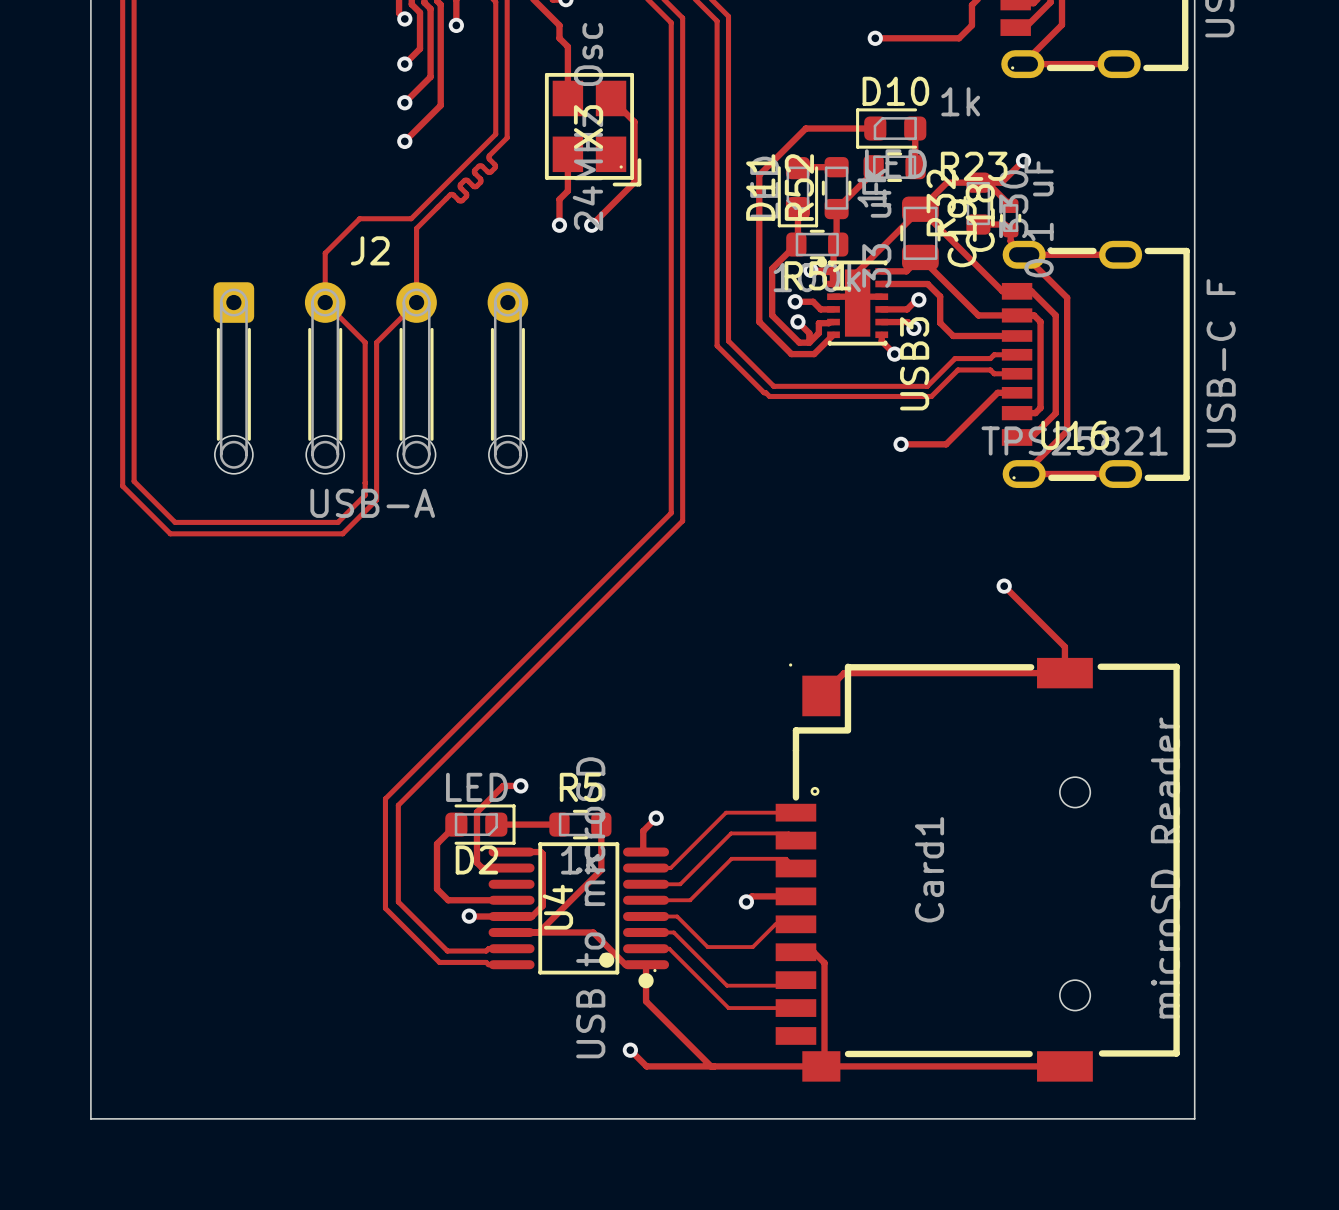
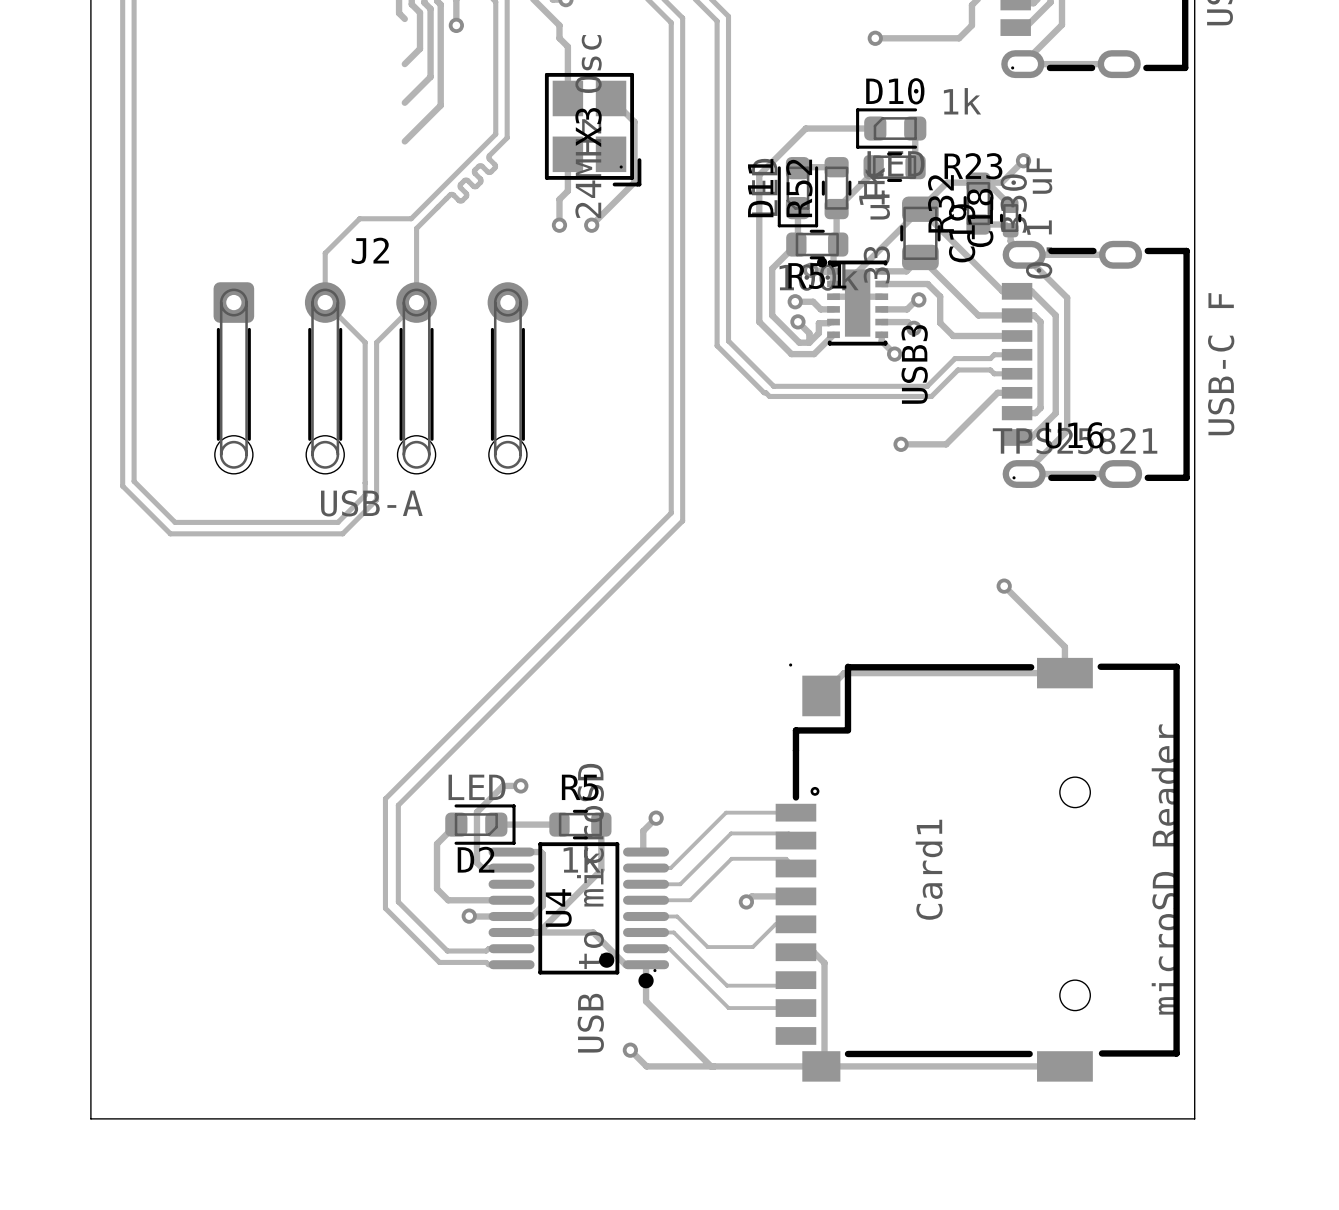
via: (404, 18) -> none
via: (404, 64) -> none
via: (404, 102) -> none
via: (404, 141) -> none

